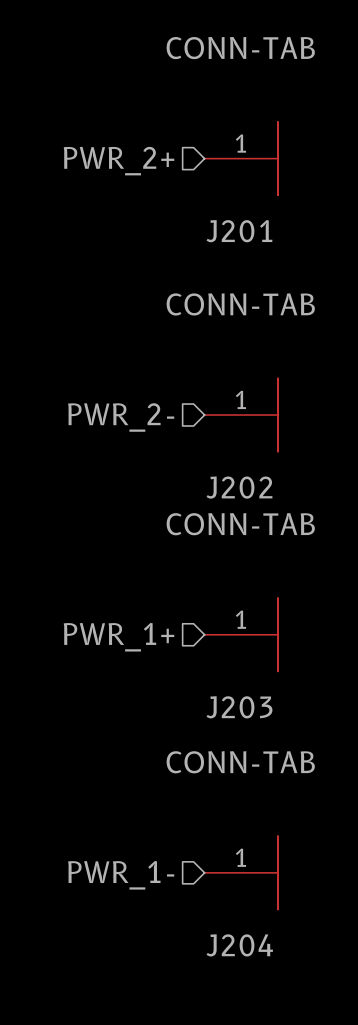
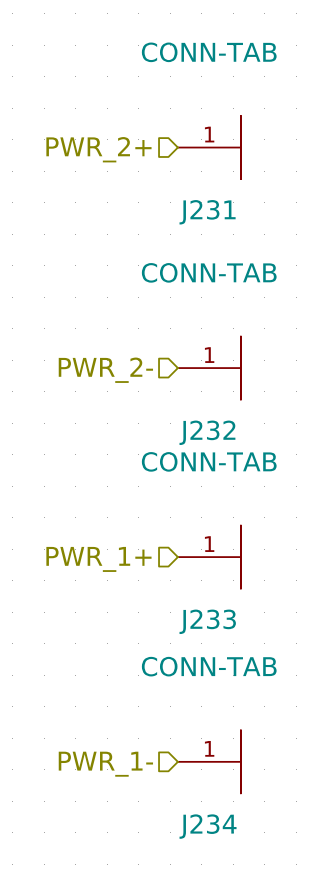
J201 name: J201 (239, 231) -> J231 (207, 212)
J202 name: J202 (239, 487) -> J232 (207, 432)
J203 name: J203 (239, 707) -> J233 (207, 621)
J204 name: J204 (239, 945) -> J234 (208, 826)

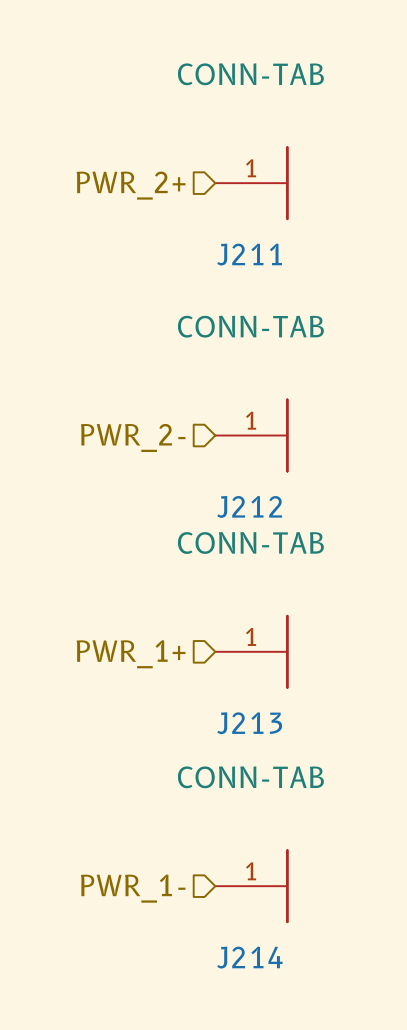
J231 name: J231 (207, 212) -> J211 (249, 254)
J232 name: J232 (207, 432) -> J212 (249, 506)
J233 name: J233 (207, 621) -> J213 (249, 723)
J234 name: J234 (208, 826) -> J214 (249, 957)

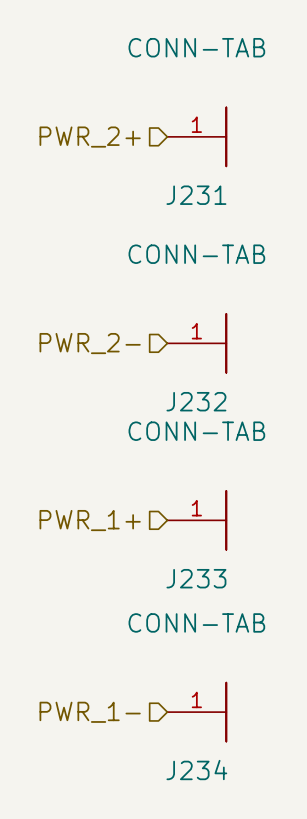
J211 name: J211 (249, 254) -> J231 (196, 195)
J212 name: J212 (249, 506) -> J232 (196, 401)
J213 name: J213 (249, 723) -> J233 (196, 578)
J214 name: J214 (249, 957) -> J234 (196, 770)

